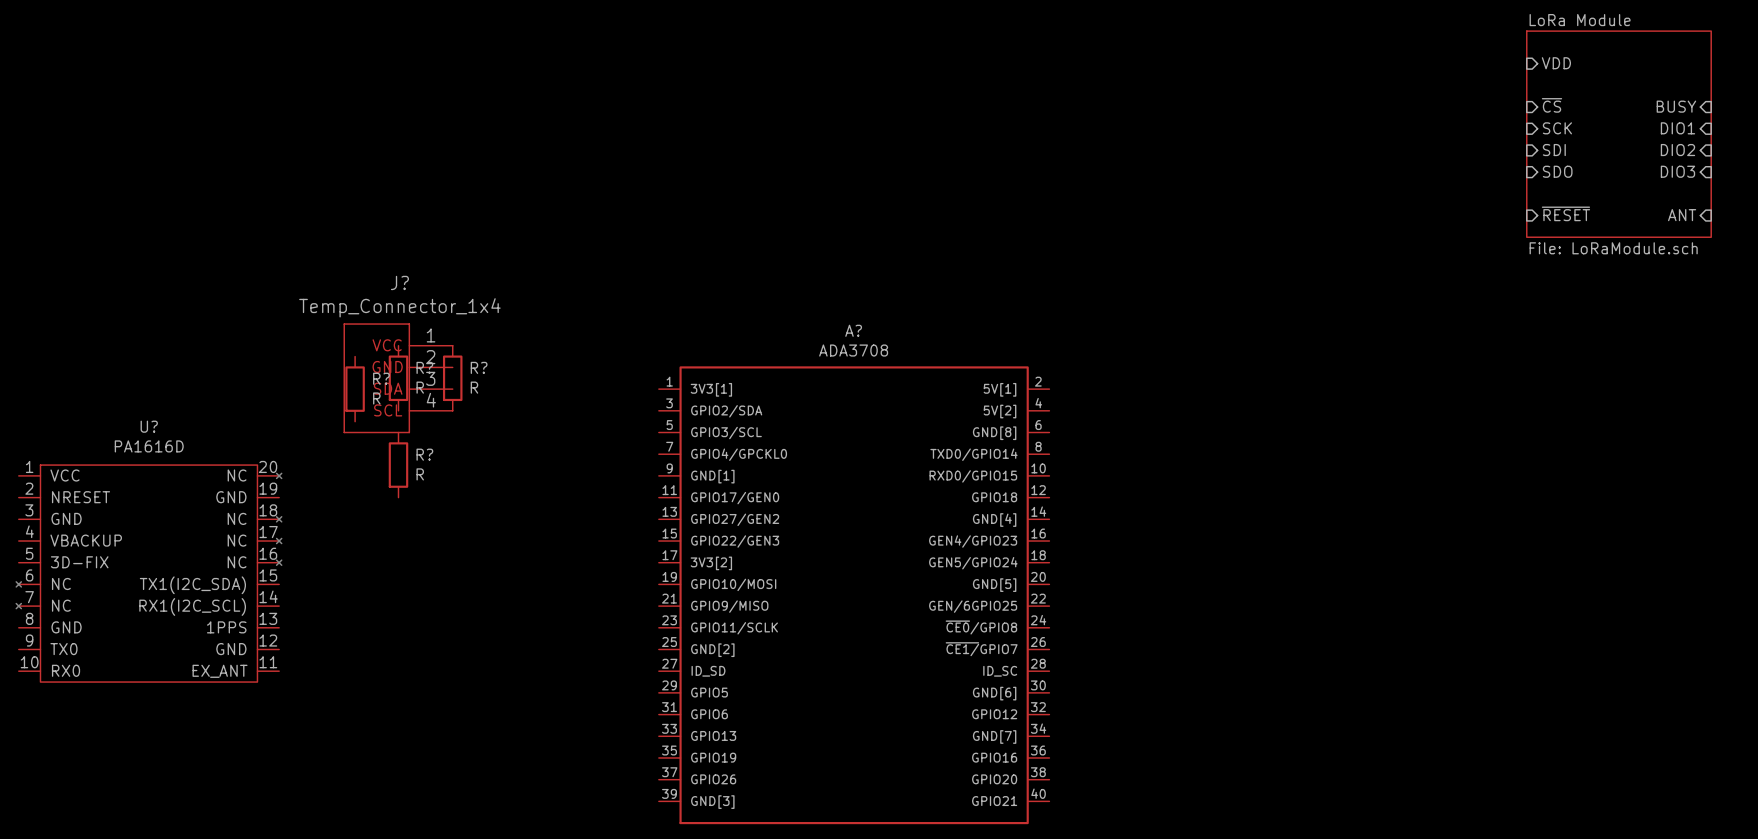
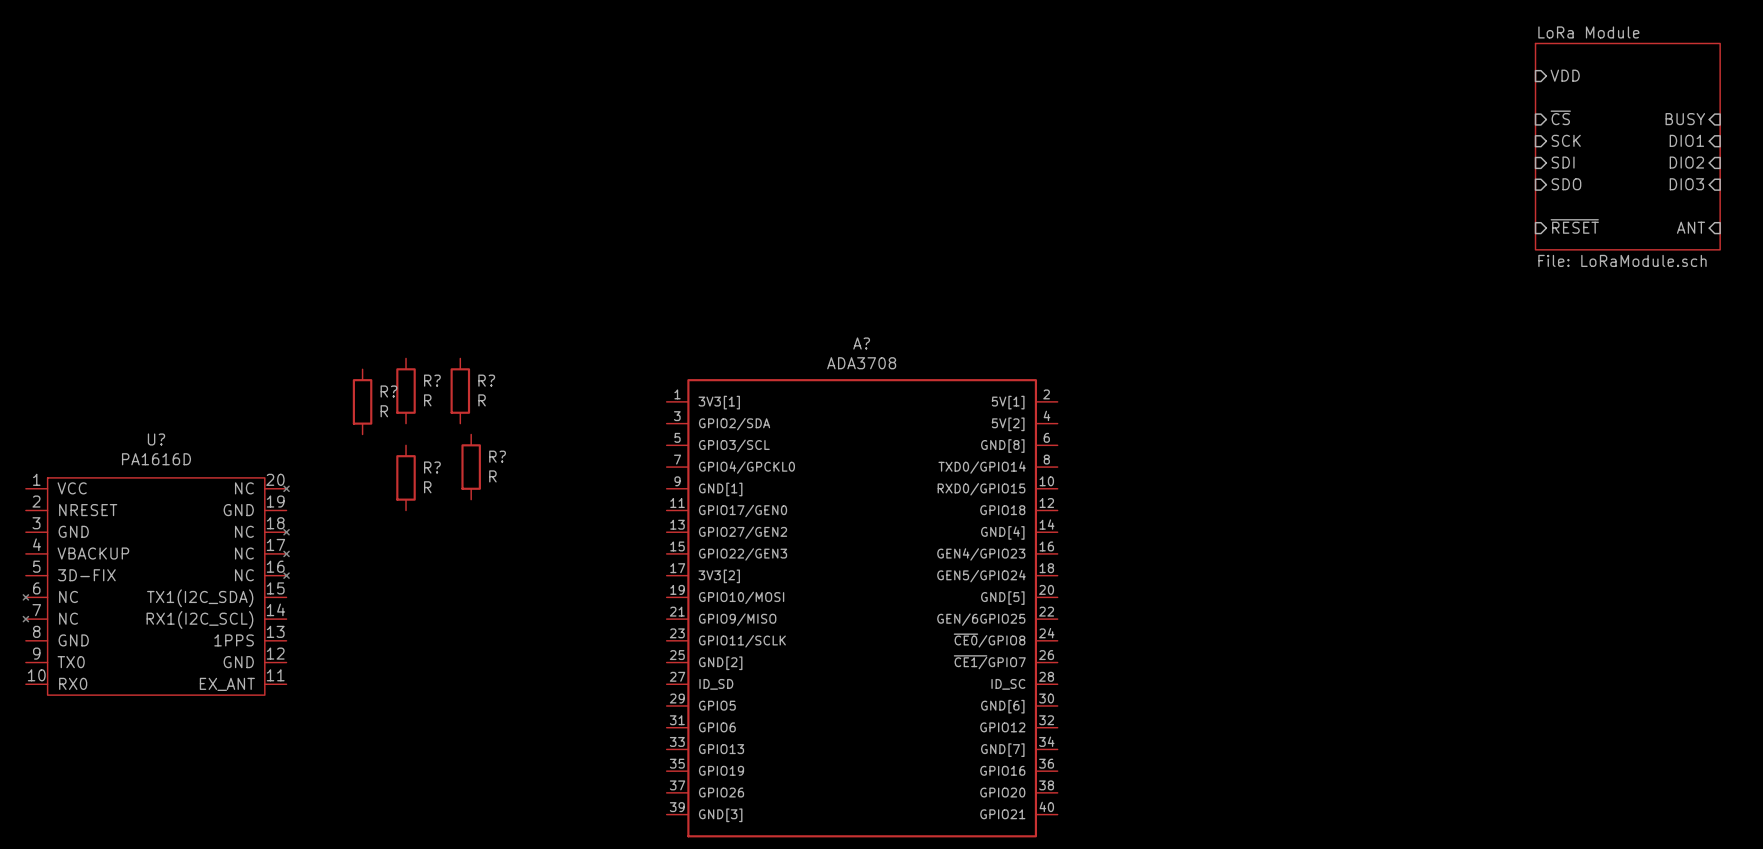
J?: Temp_Connector_1x4 (398, 378) -> none
R?: none -> R (471, 467)

